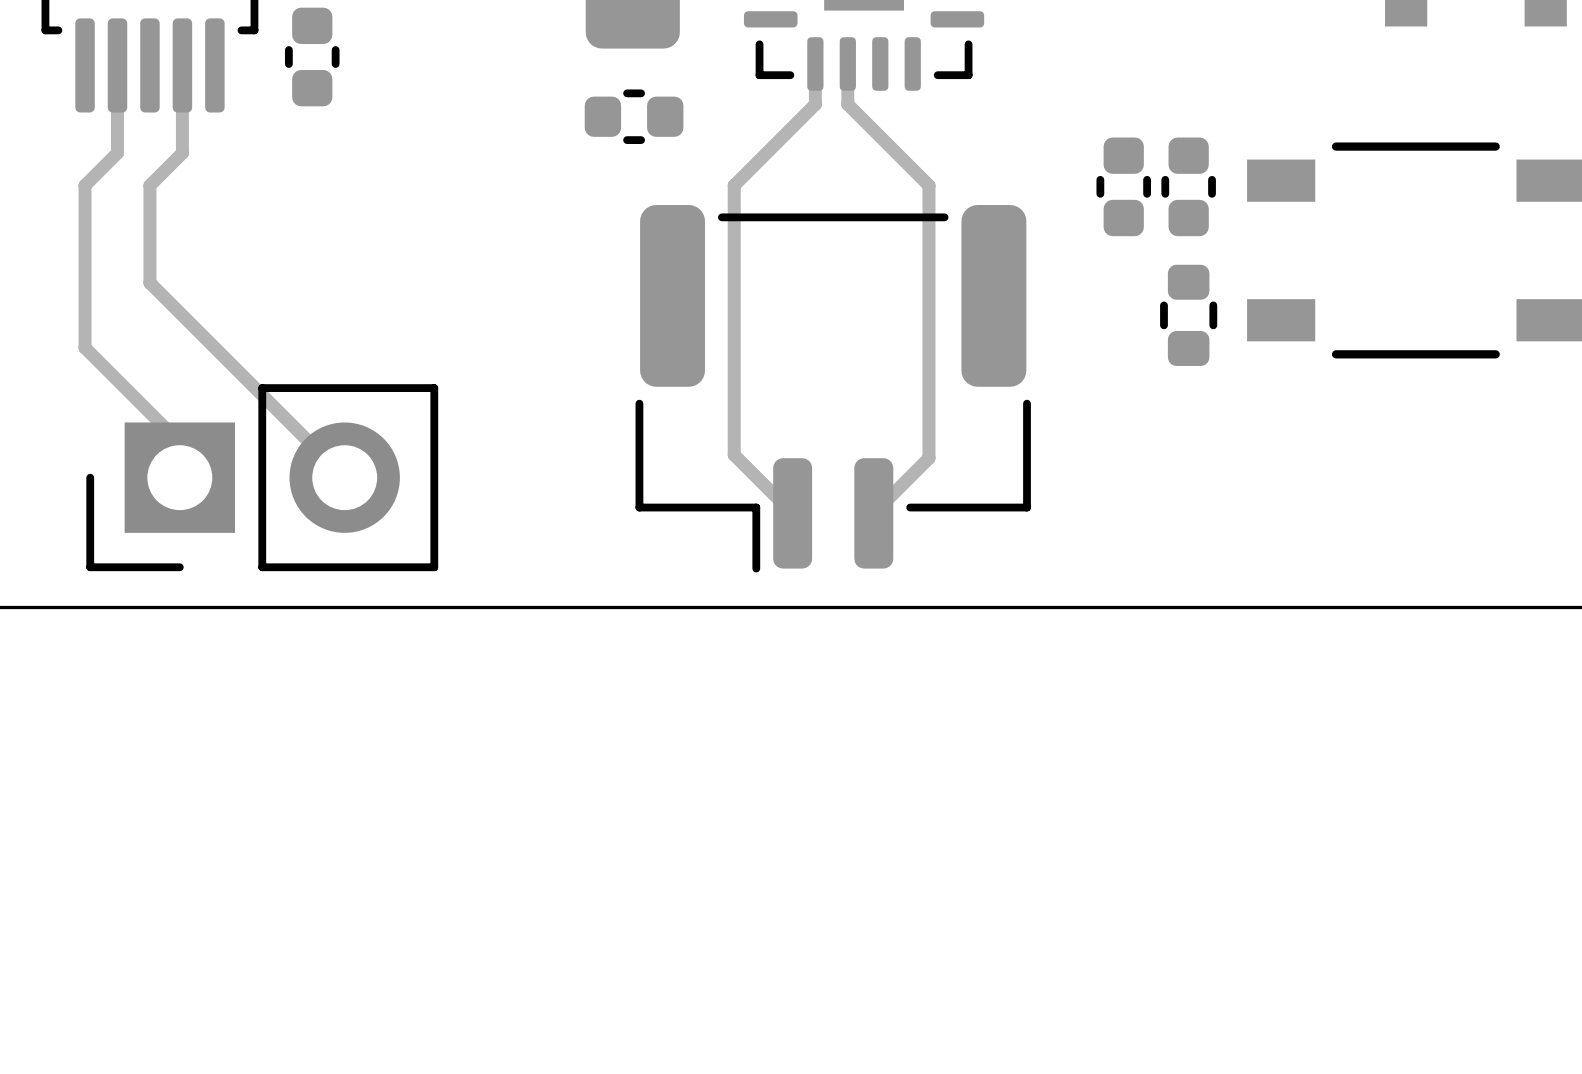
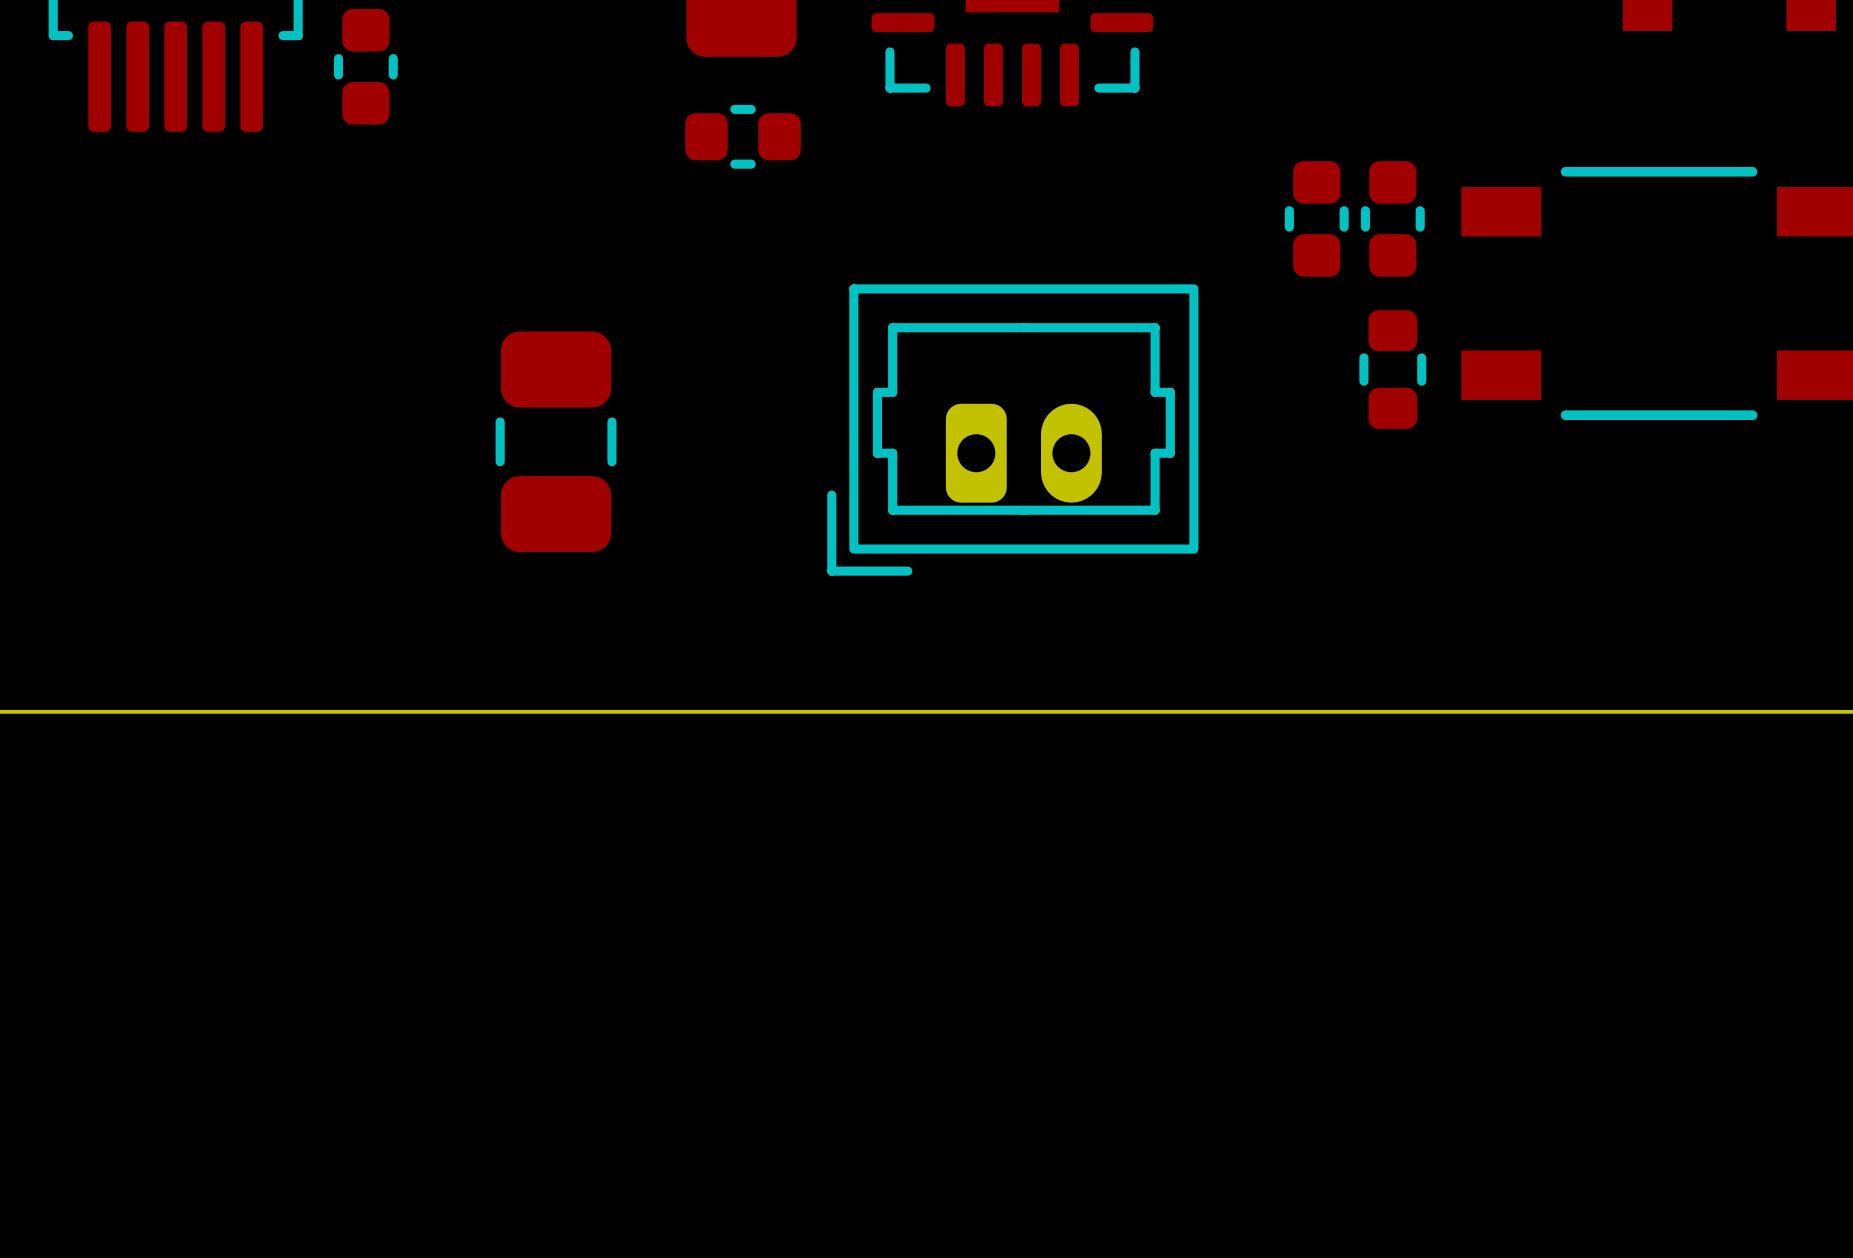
track: (815, 63) (815, 104) (734, 185) (734, 454) (792, 513) -> none
track: (847, 63) (847, 104) (928, 185) (928, 458) (873, 513) -> none
track: (117, 65) (117, 153) (85, 185) (85, 347) (179, 442) (179, 477) -> none
track: (182, 65) (182, 153) (149, 185) (149, 282) (344, 477) -> none
part footprint: [635, 205, 1031, 573] -> [827, 284, 1199, 576]
part: none -> (556, 441)
part: (262, 477) -> none

